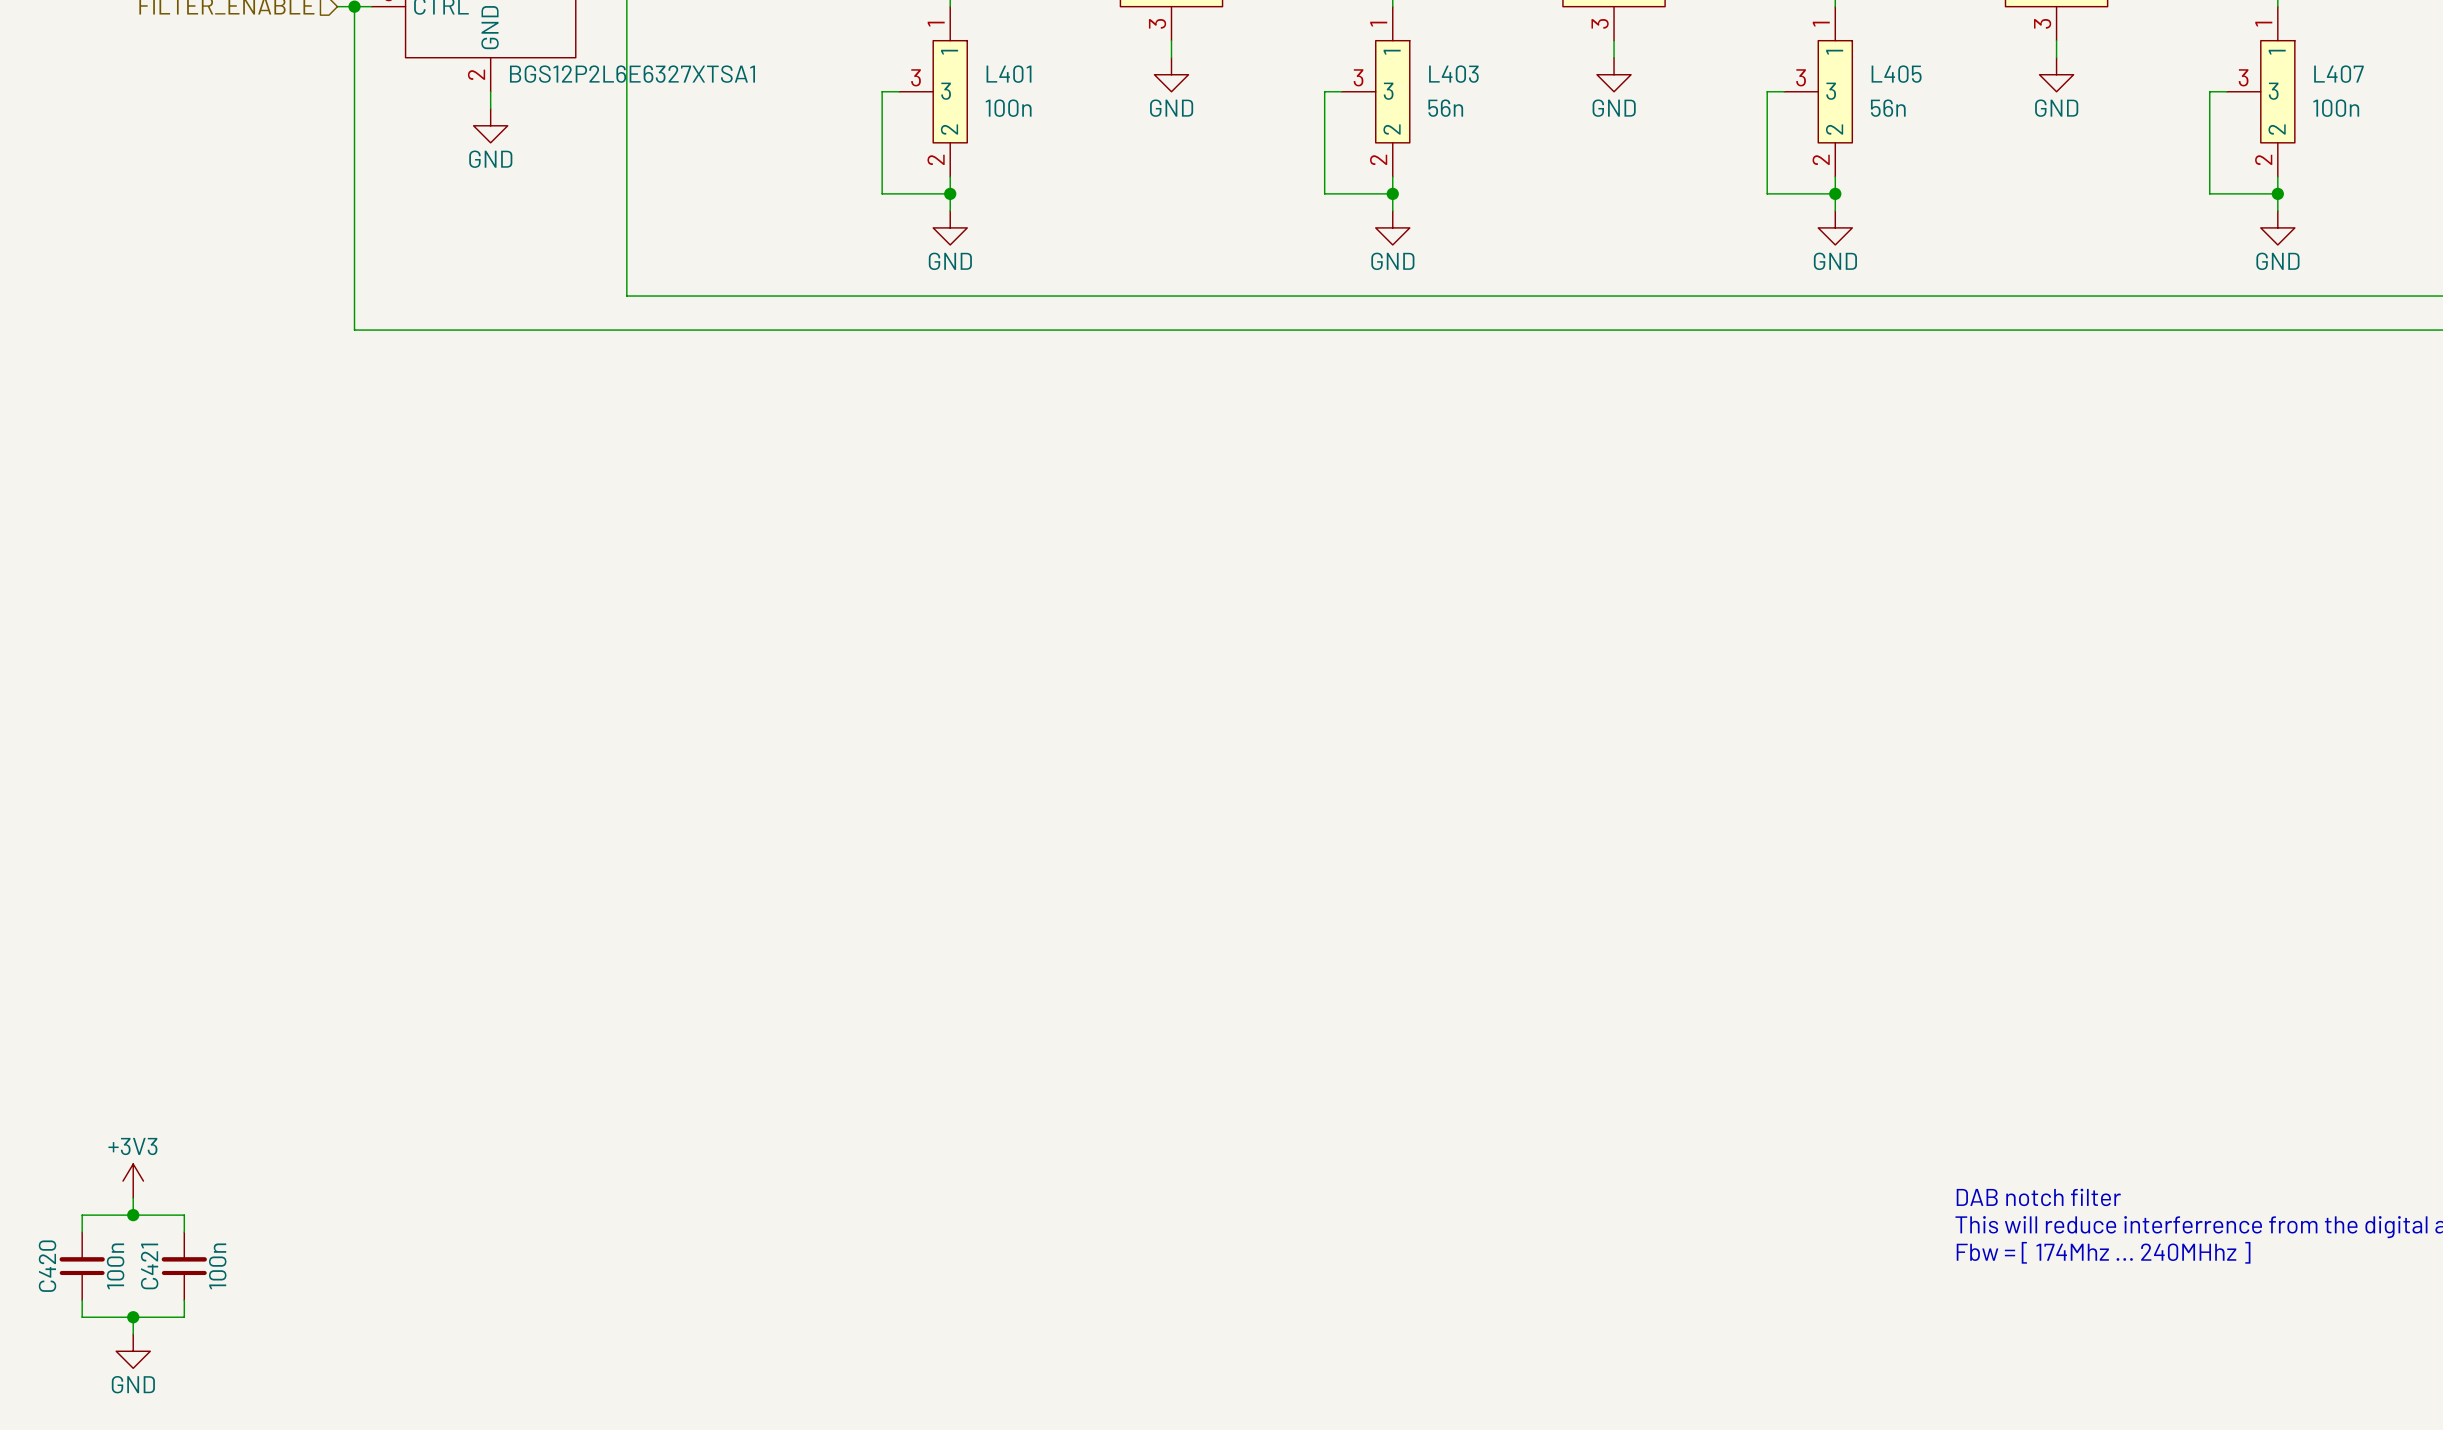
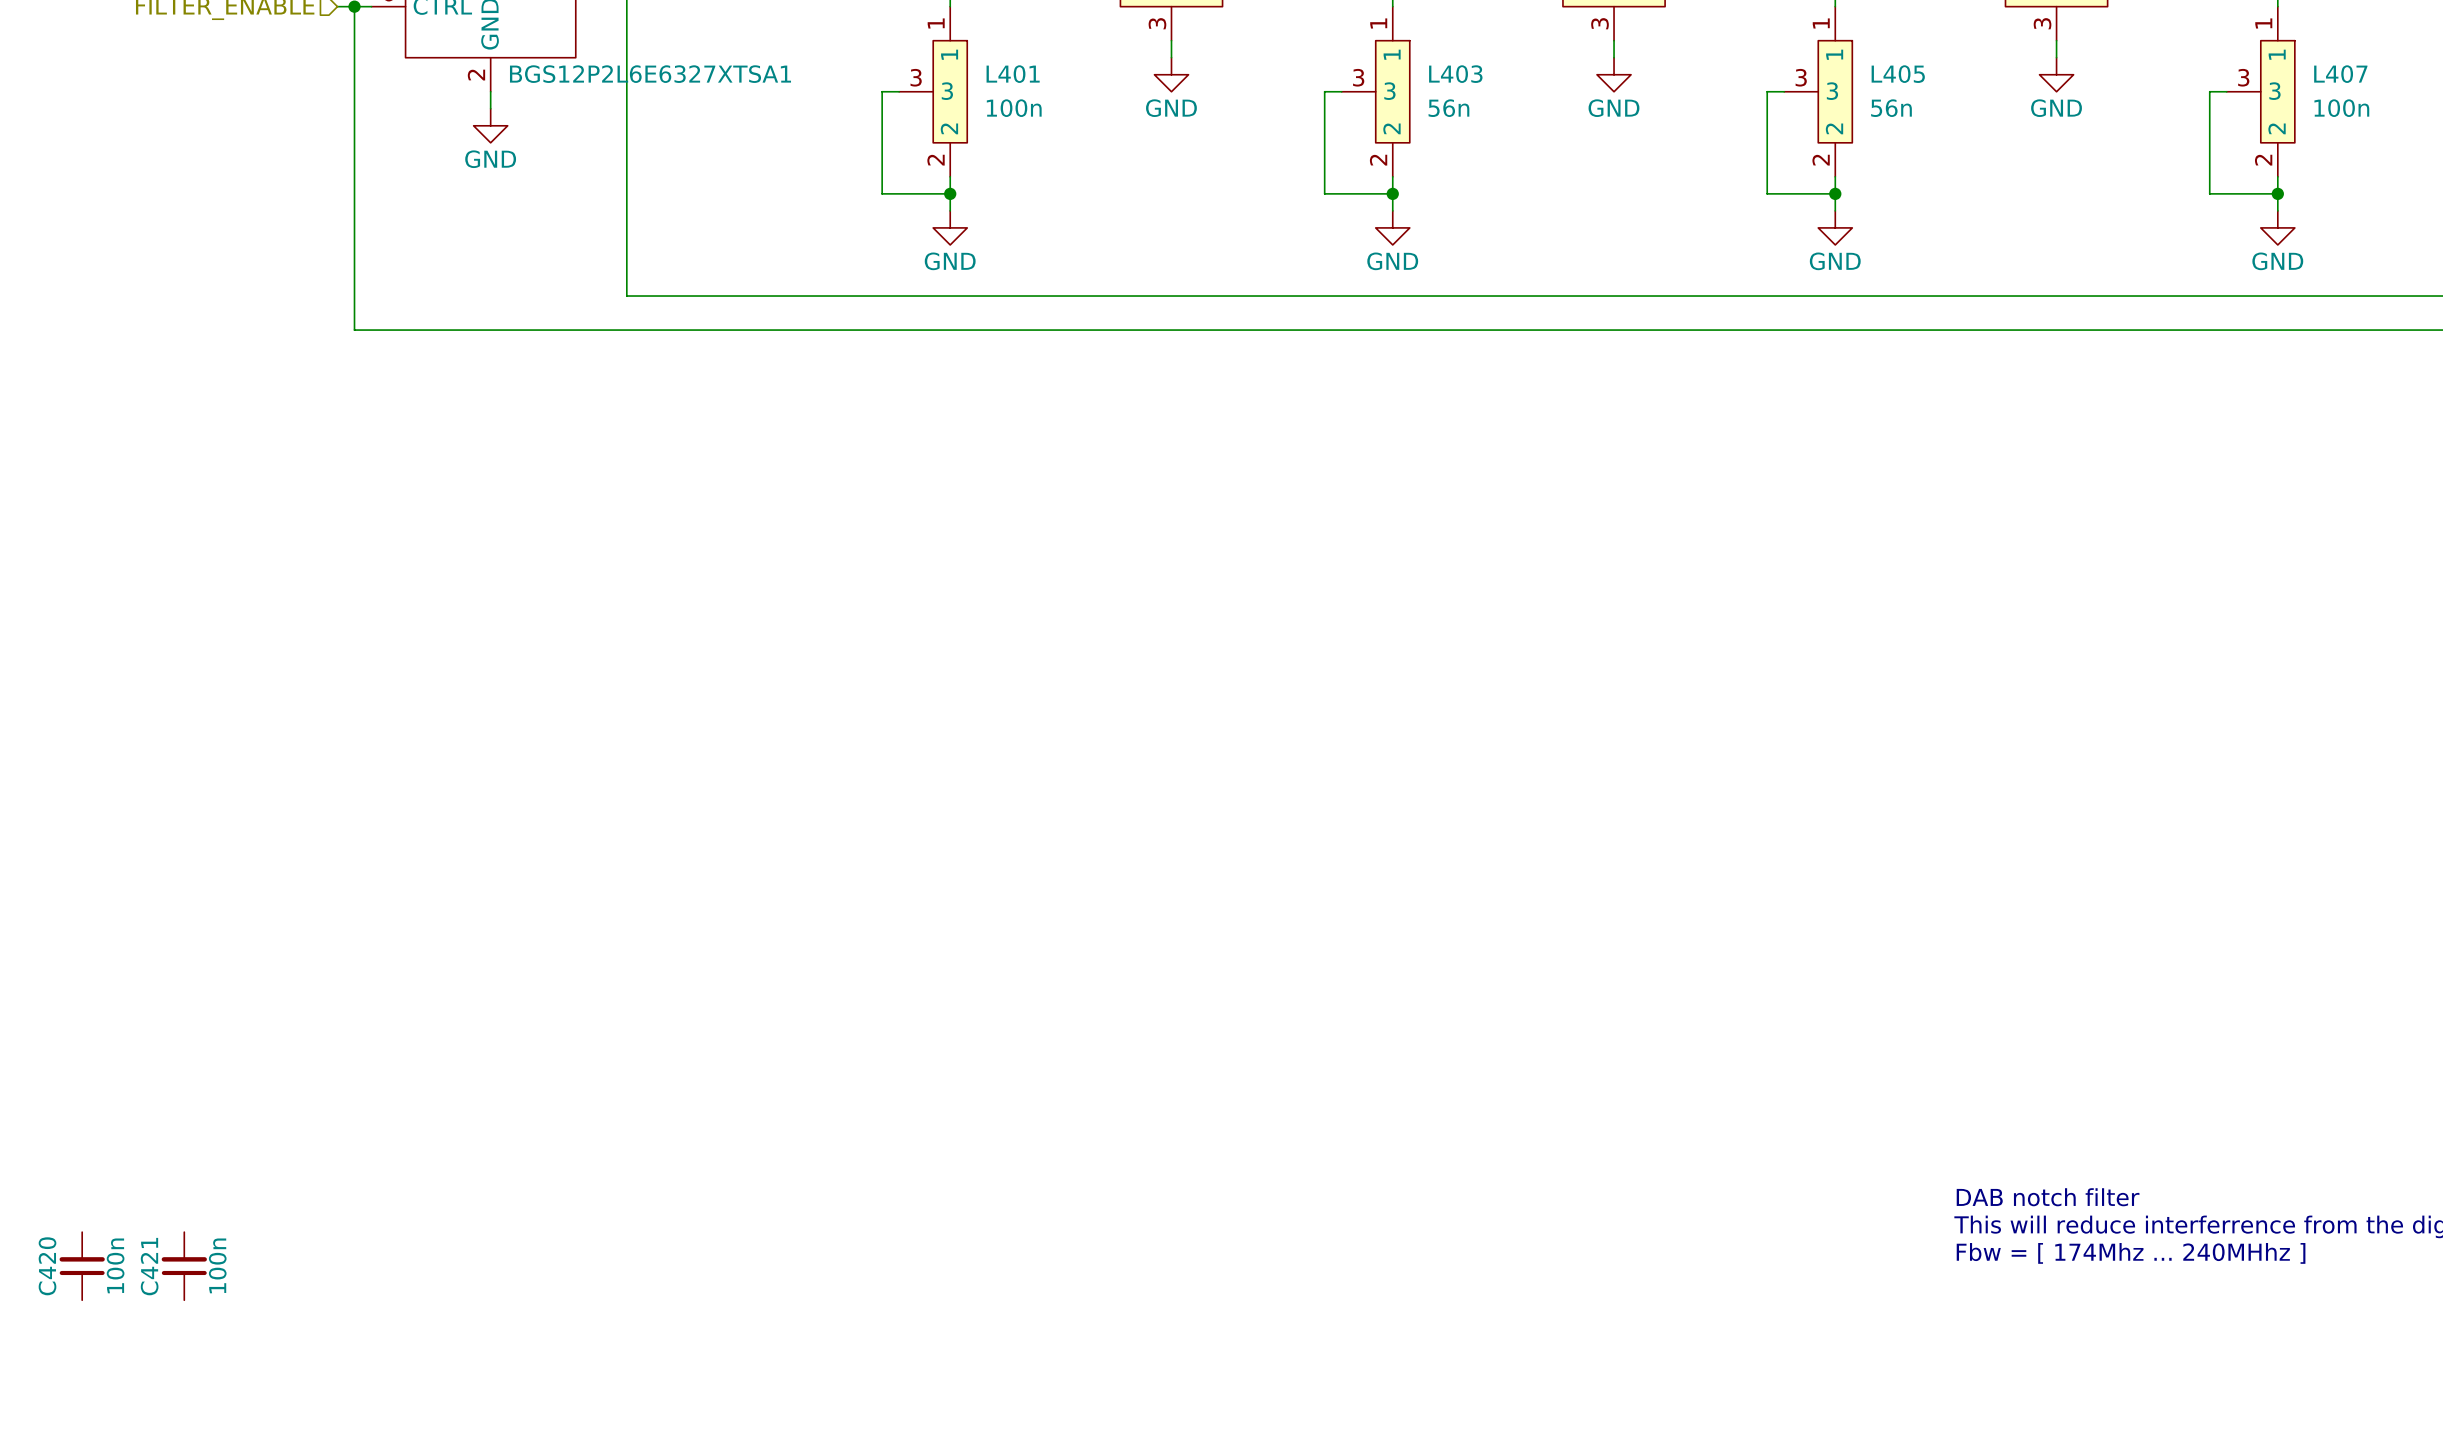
power symbol: +3V3 (133, 1181) -> none
wire: (133, 1198) (133, 1215) -> none
junction: (133, 1215) -> none
wire: (82, 1232) (82, 1215) (184, 1215) (184, 1232) -> none
wire: (82, 1300) (82, 1317) (184, 1317) (184, 1300) -> none
wire: (133, 1317) (133, 1334) -> none
junction: (133, 1317) -> none
power symbol: GND (133, 1351) -> none

